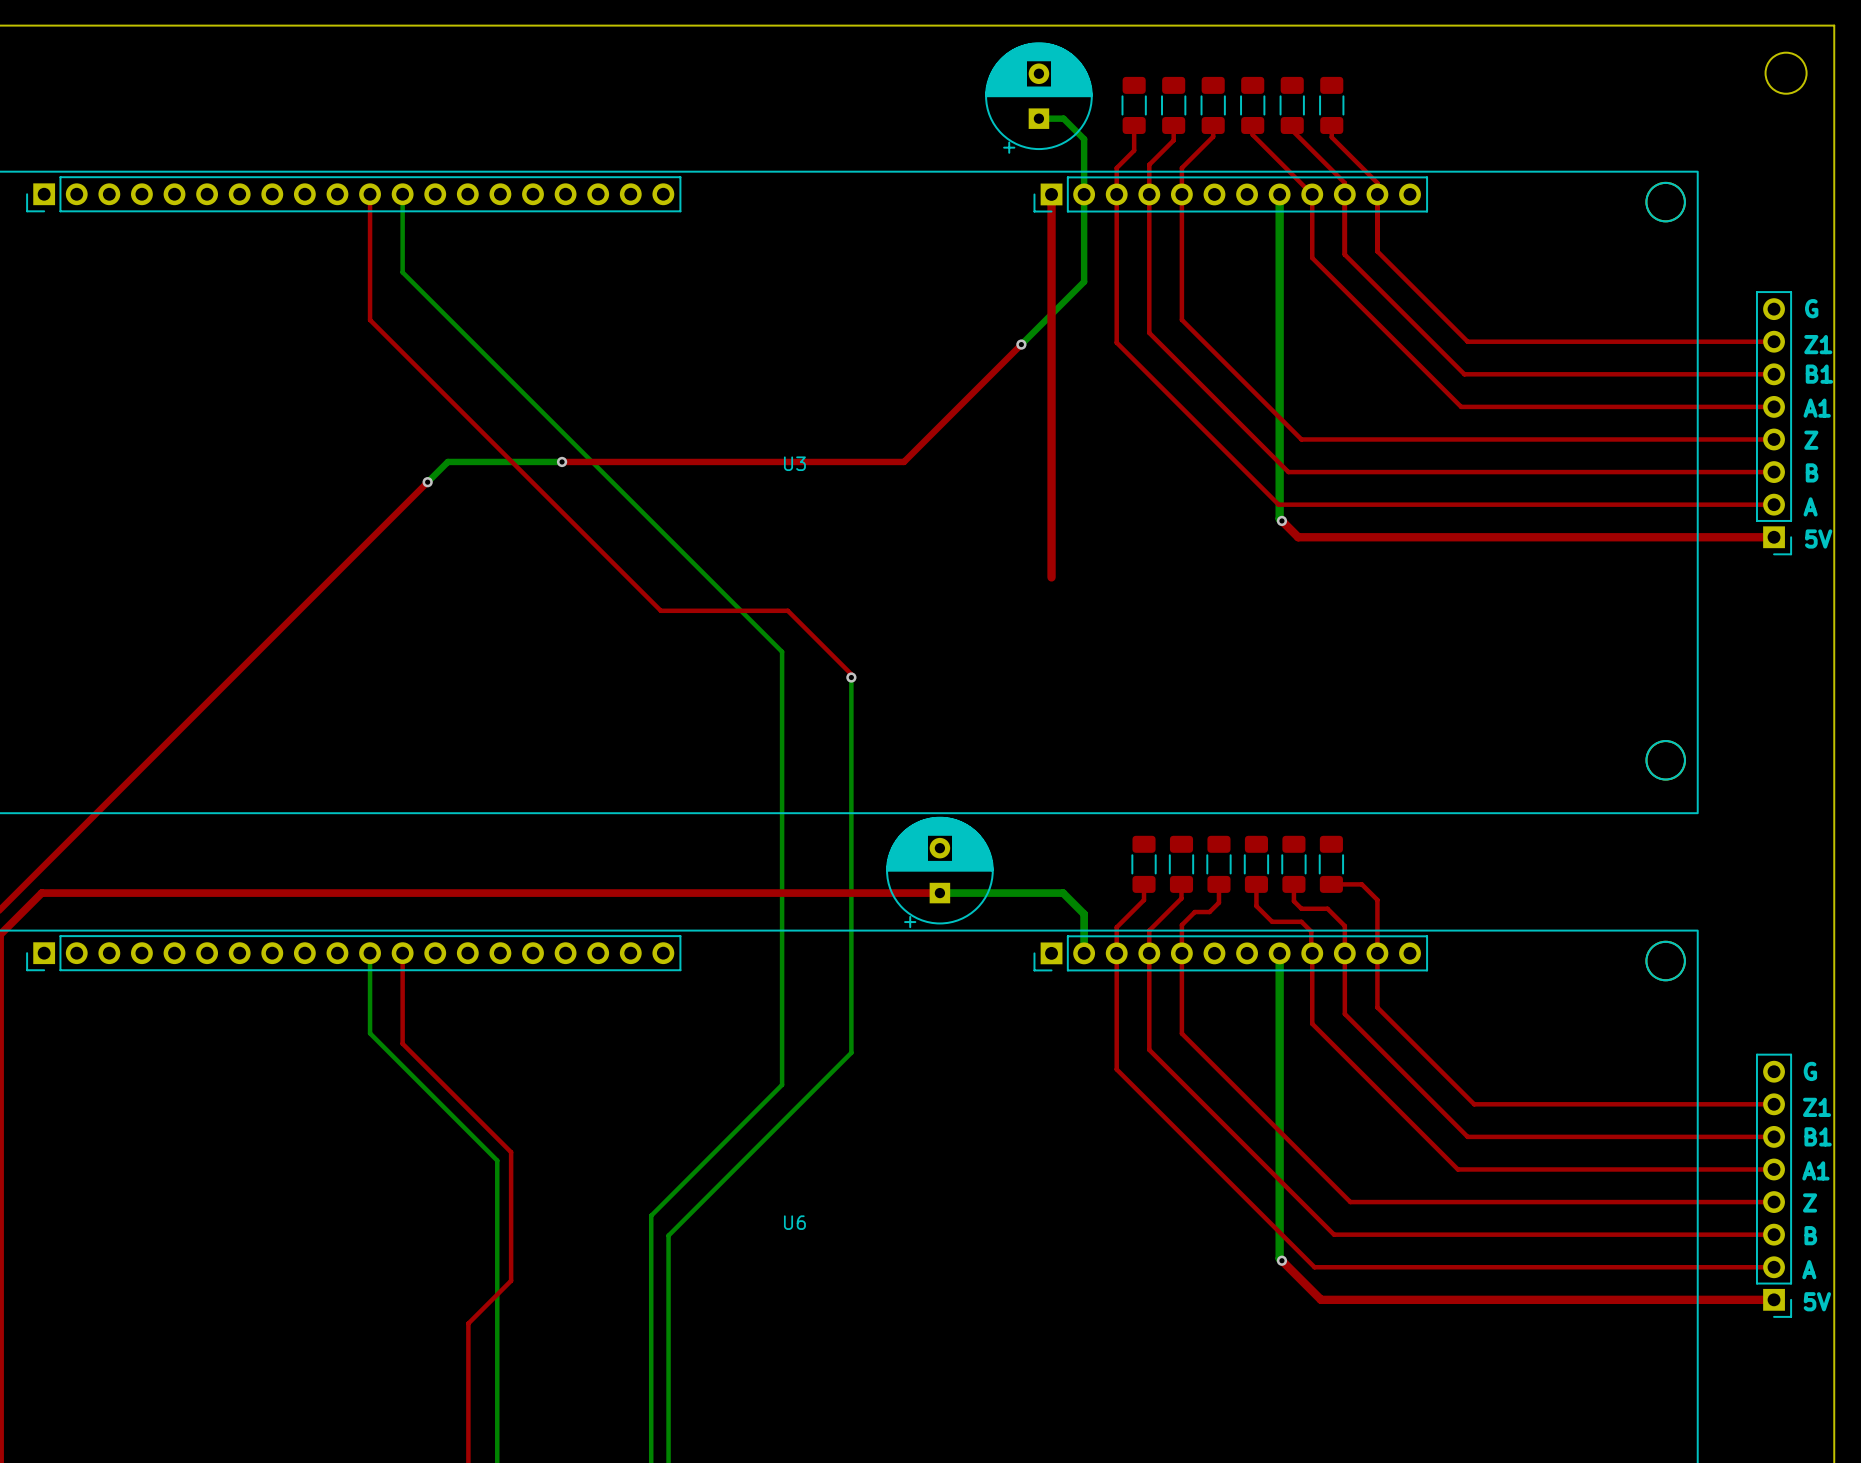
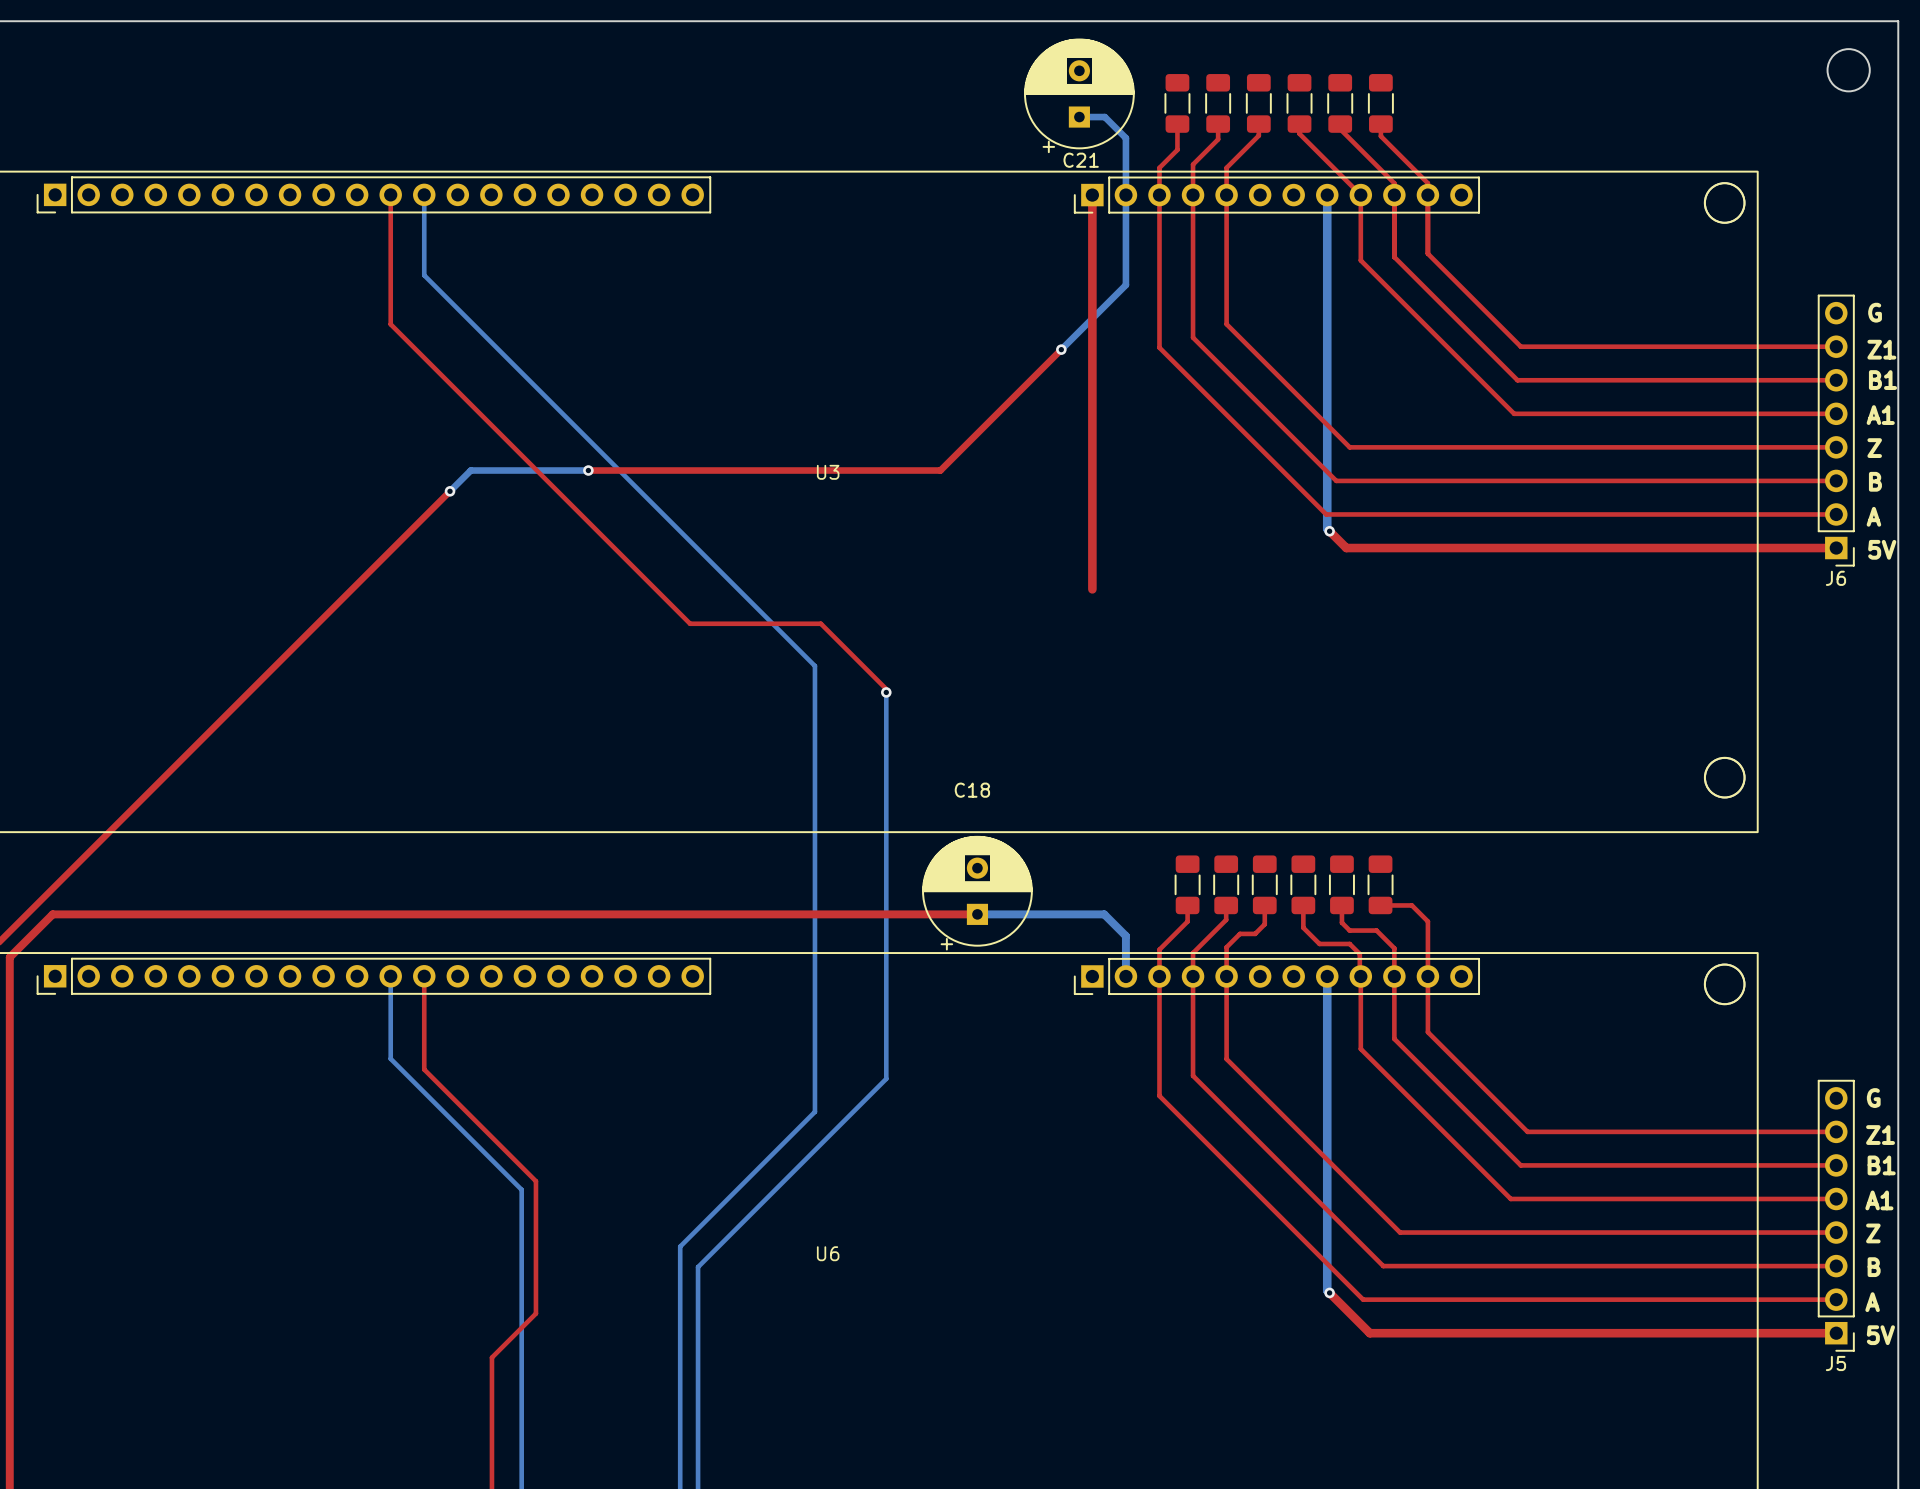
C21 name: none -> C21 (1081, 160)
J6 name: none -> J6 (1835, 578)
C18 name: none -> C18 (972, 790)
J5 name: none -> J5 (1835, 1363)

